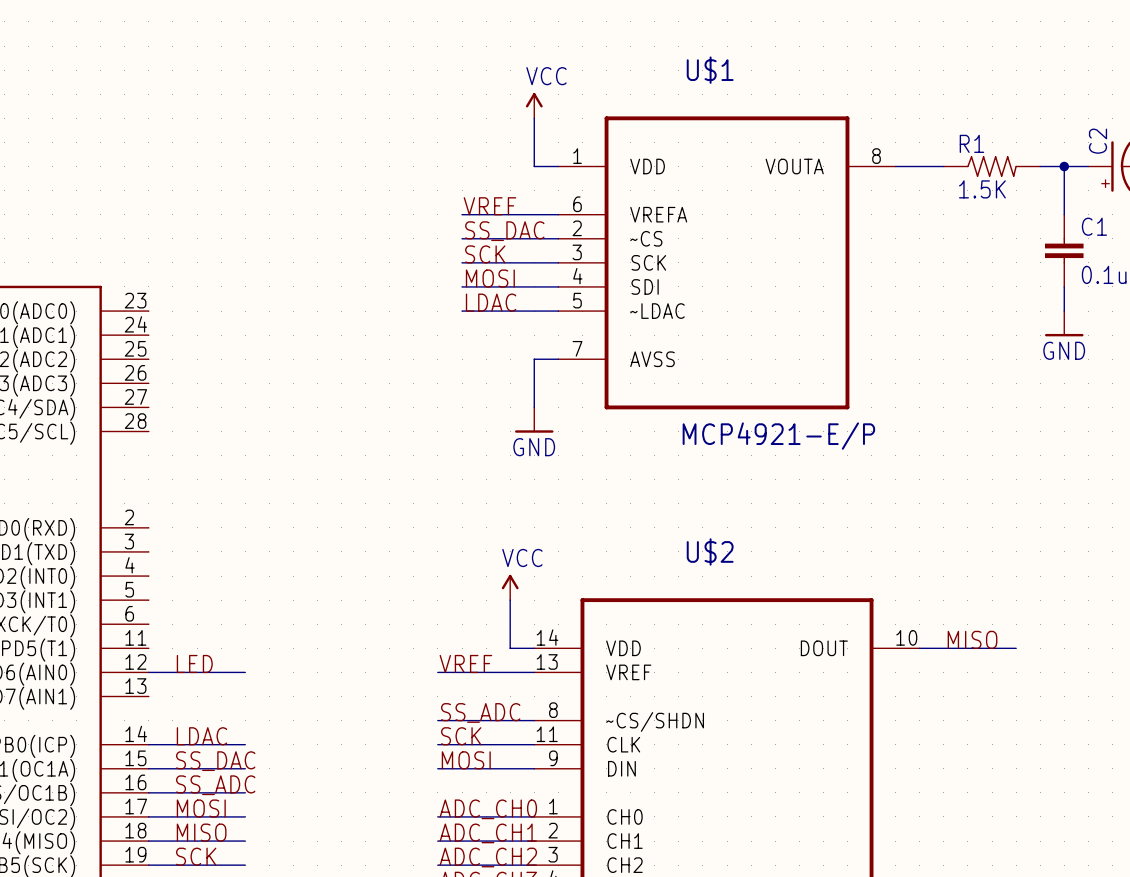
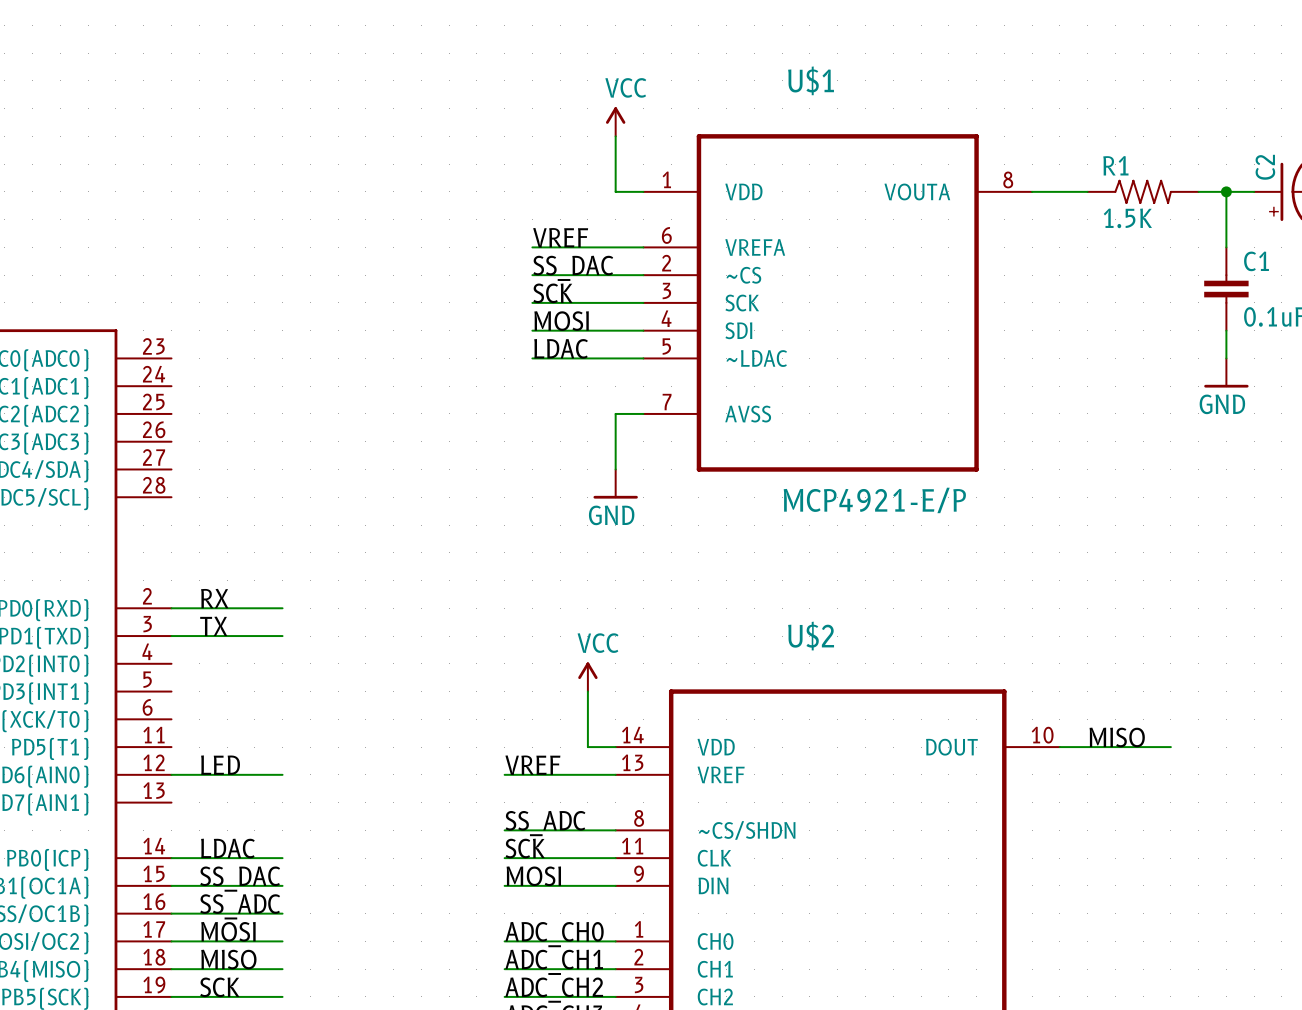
label: none -> RX (214, 598)
wire: none -> (171, 608) (282, 608)
label: none -> TX (213, 626)
wire: none -> (171, 636) (282, 636)

